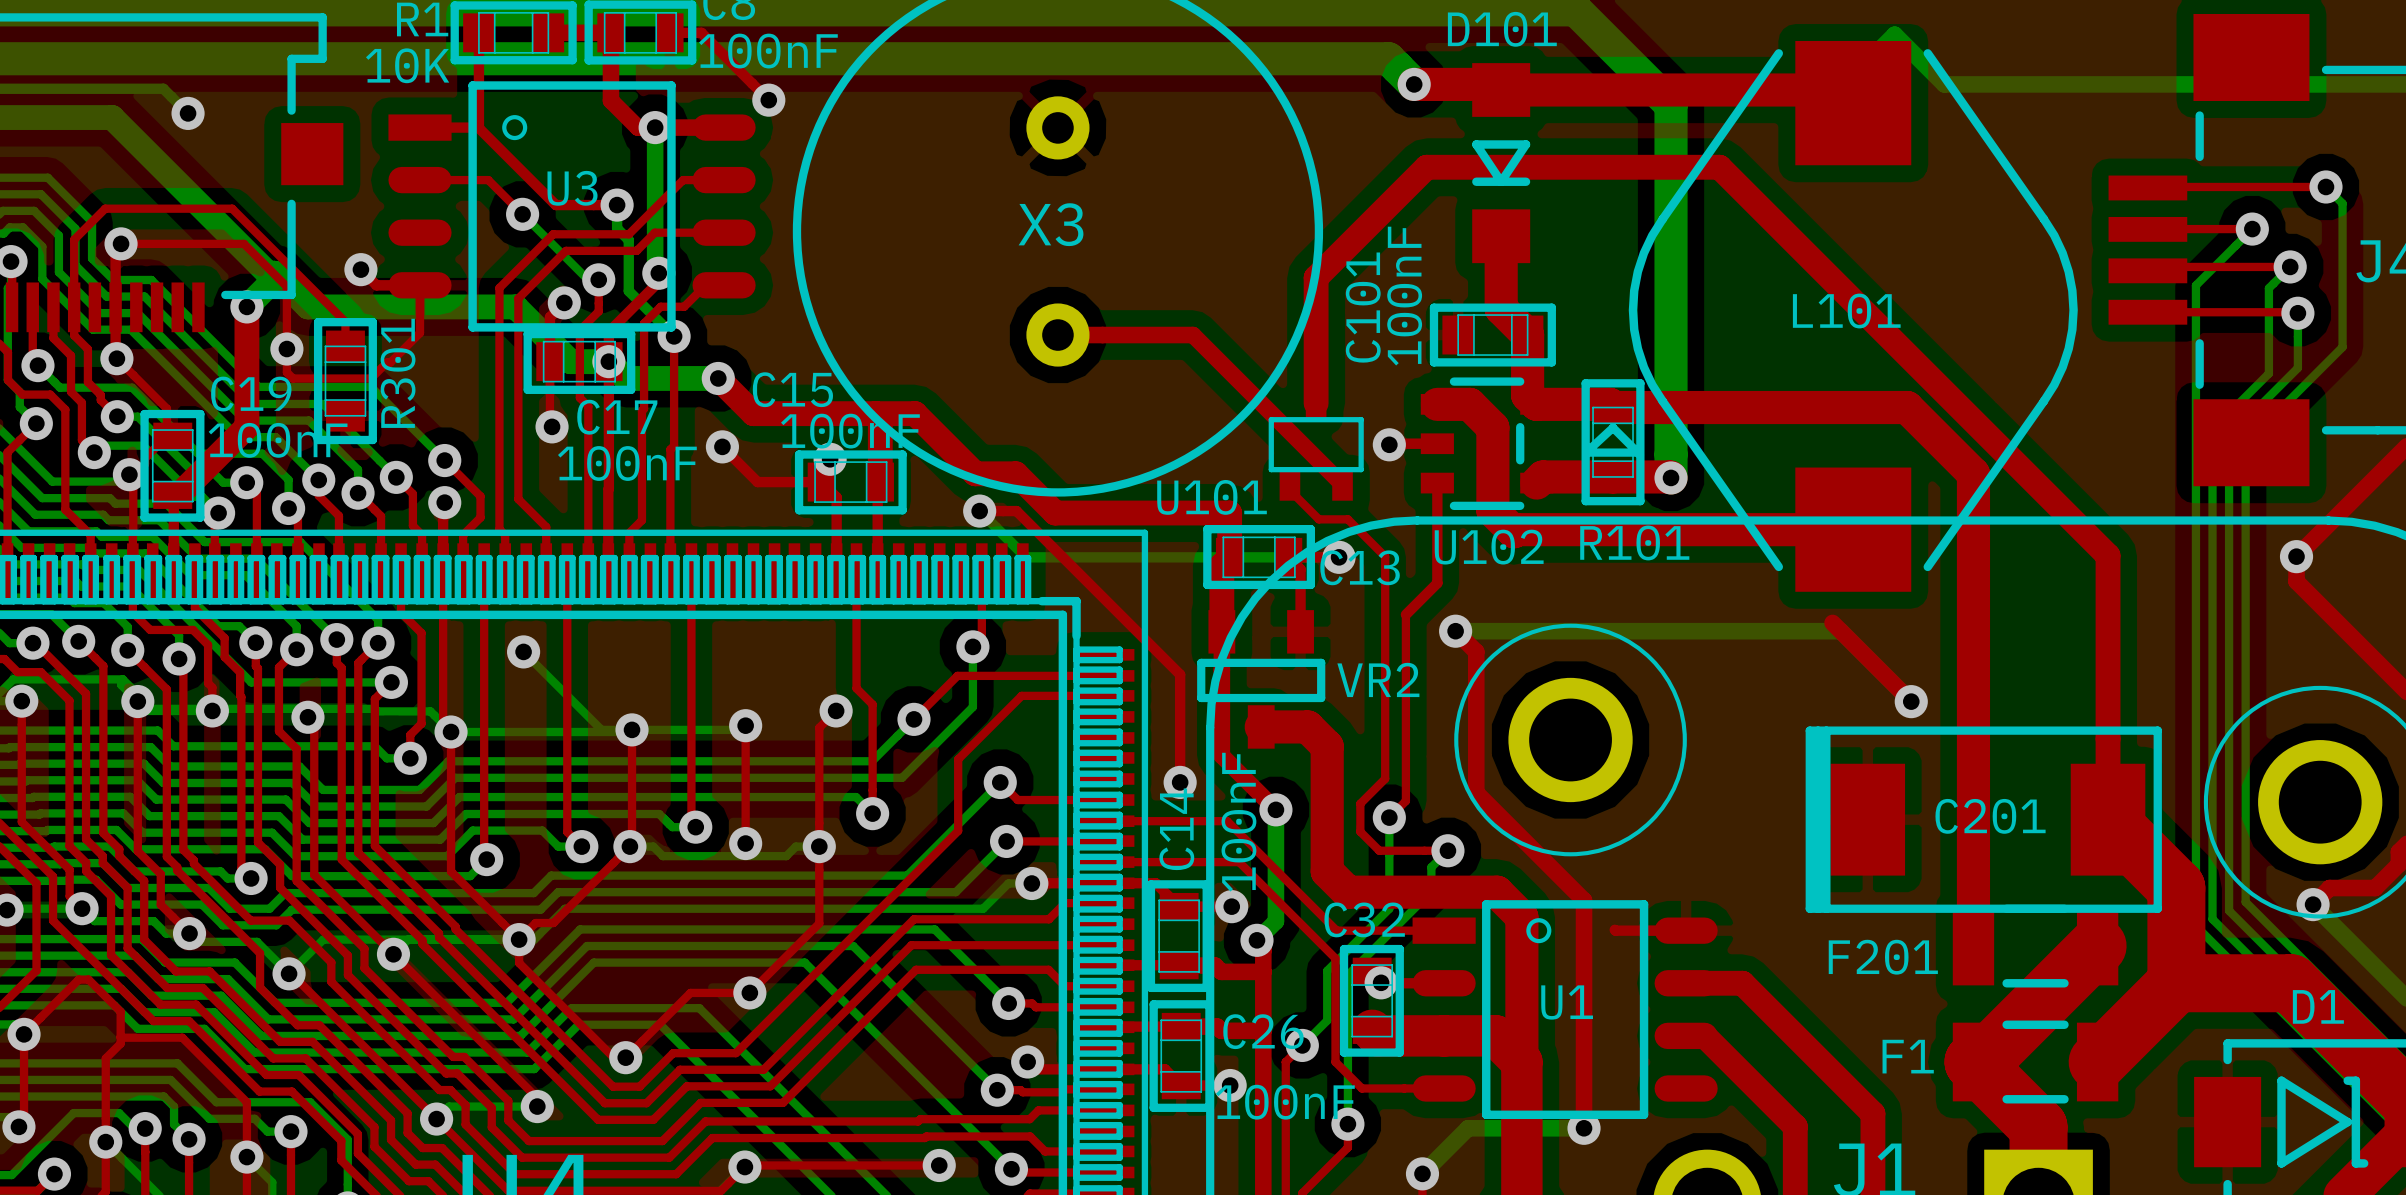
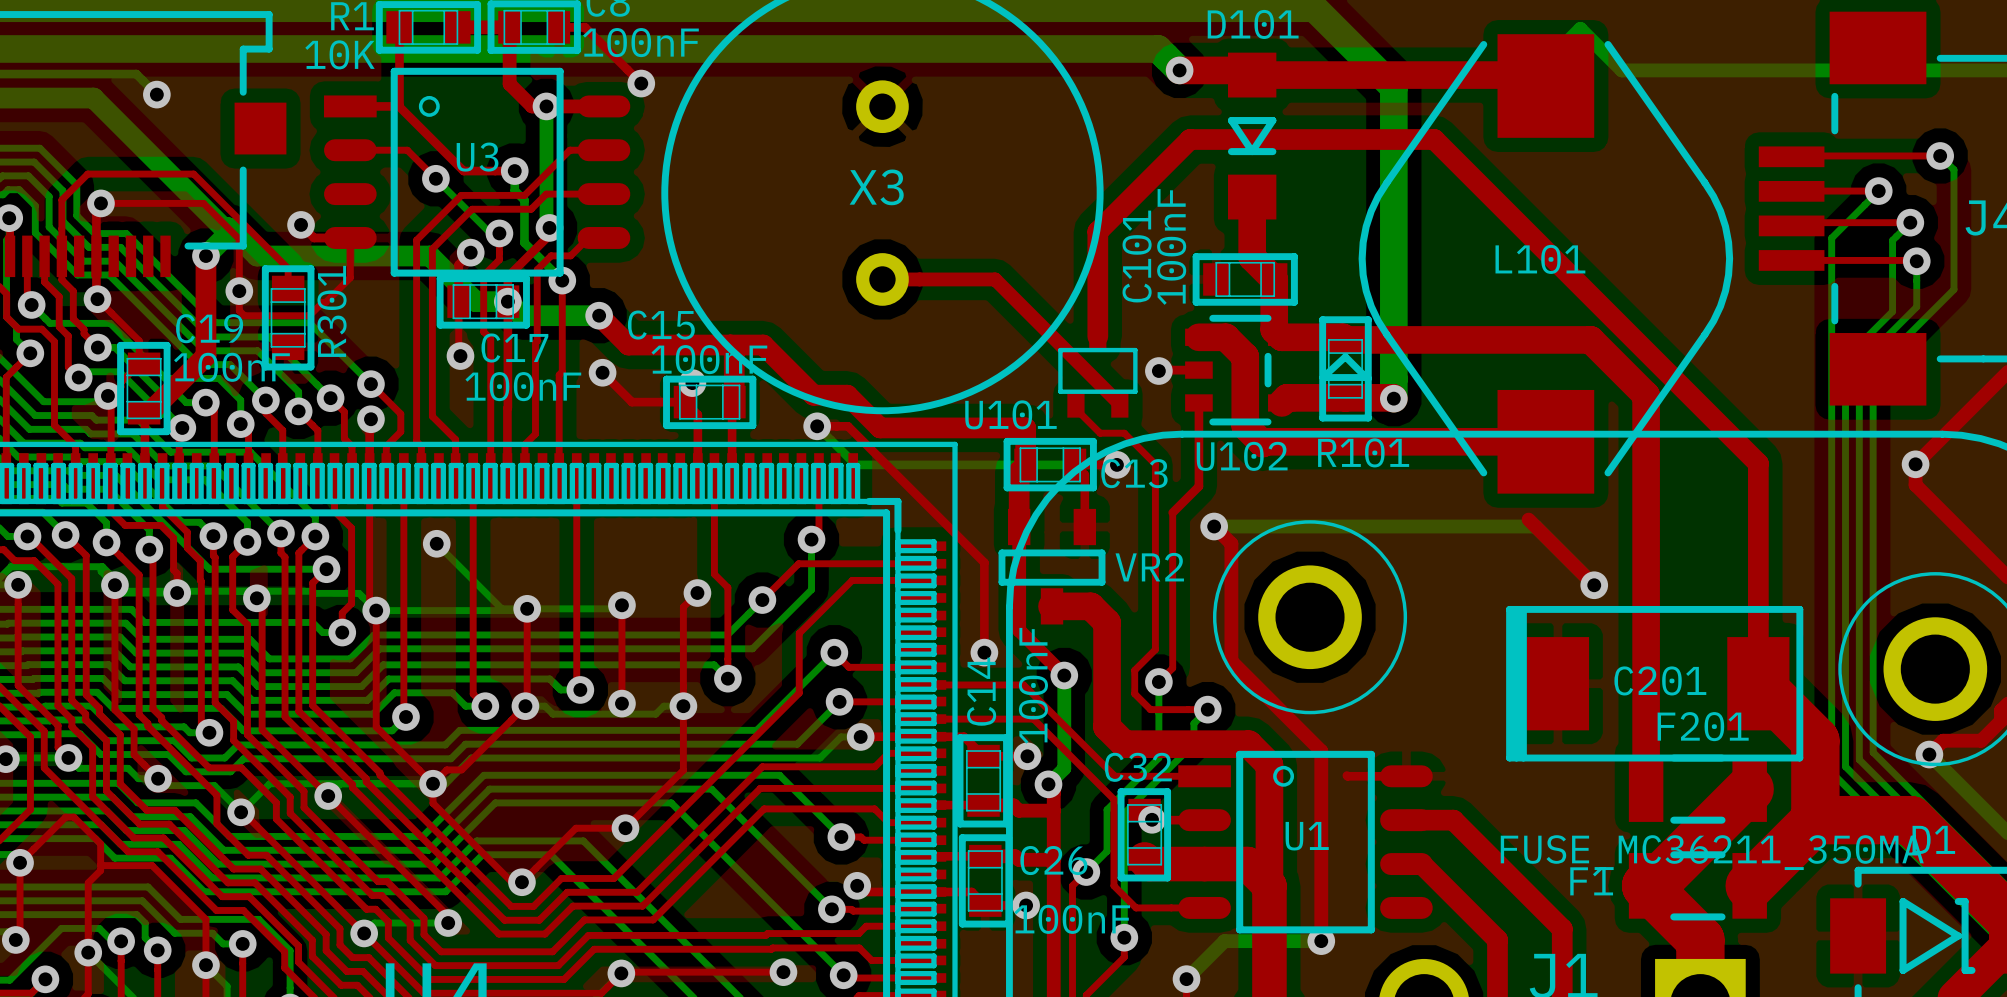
F201 name position: F201 (1883, 957) -> F201 (1703, 726)
F201 value: none -> FUSE_MC36211_350MA (1712, 852)

